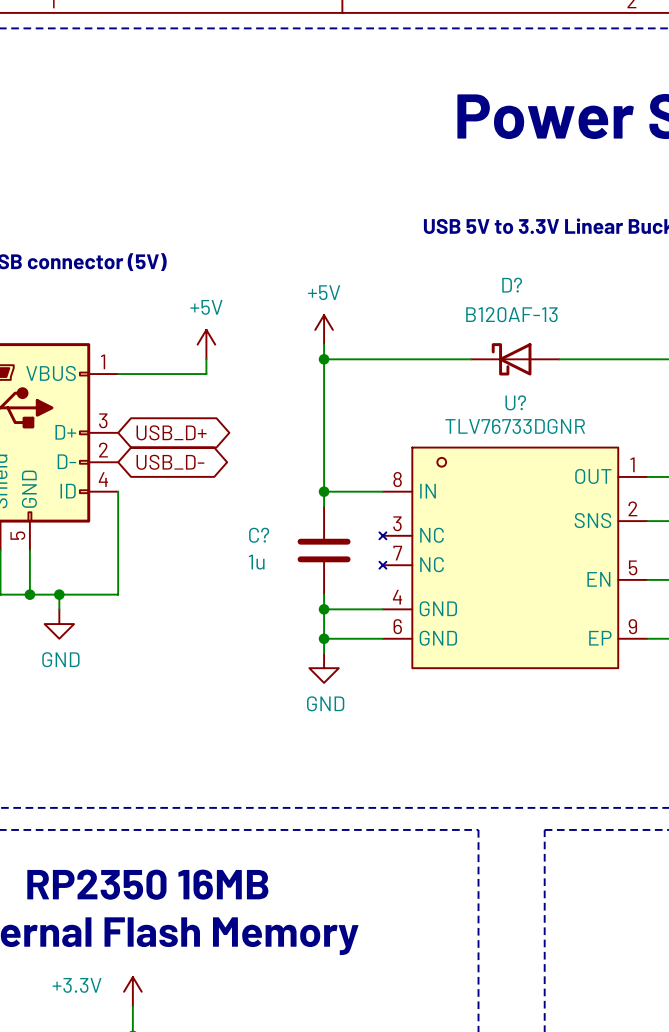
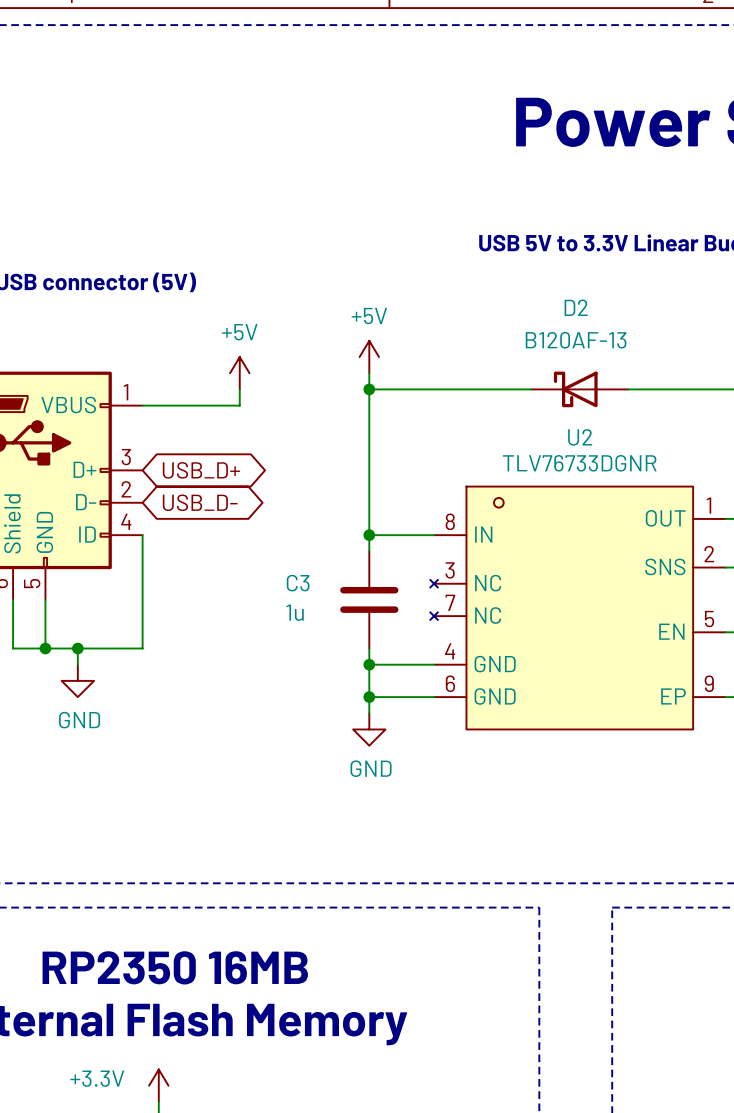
D? name: D? (512, 285) -> D2 (576, 307)
U? name: U? (515, 402) -> U2 (580, 437)
C? name: C? (259, 535) -> C3 (298, 583)

